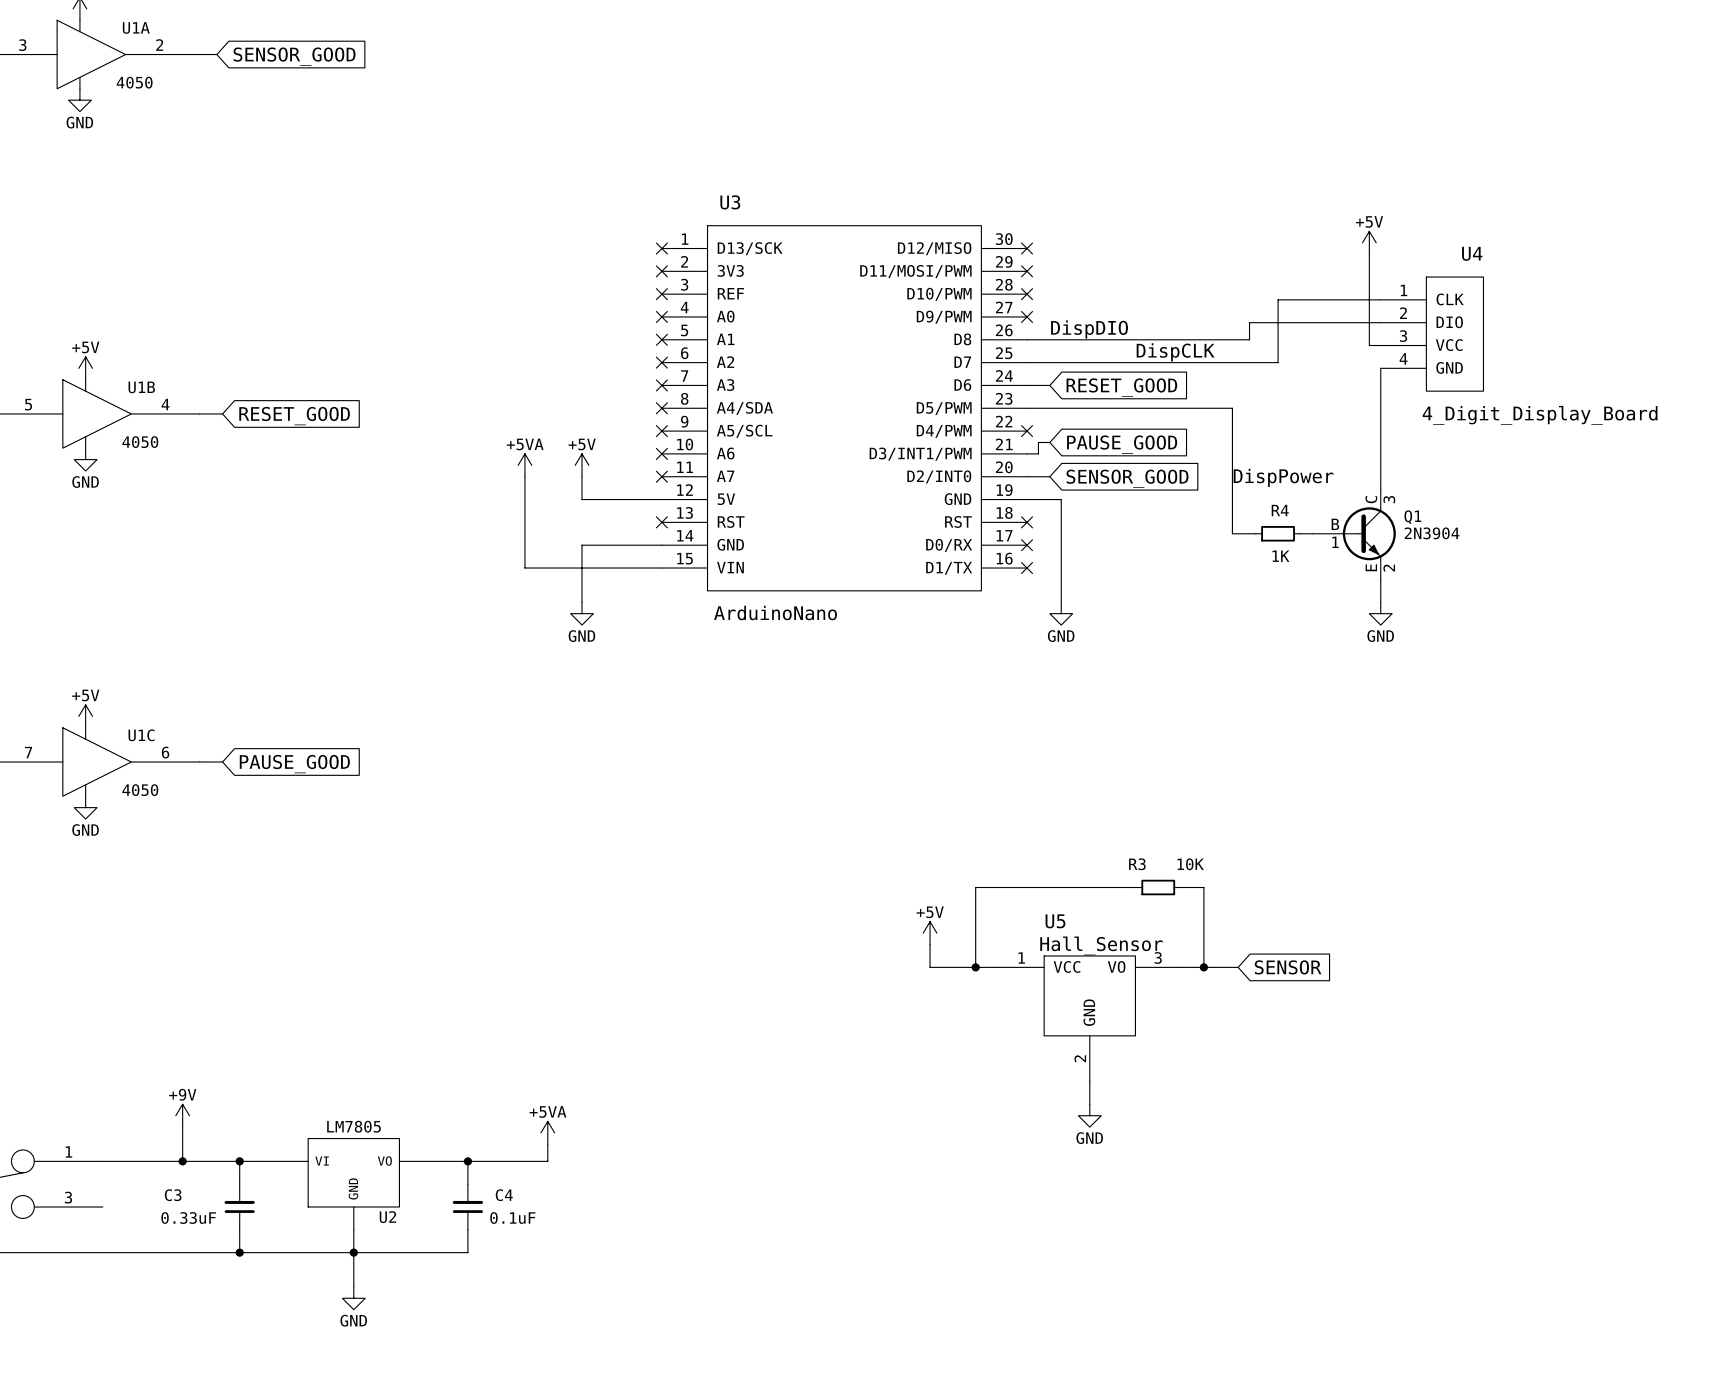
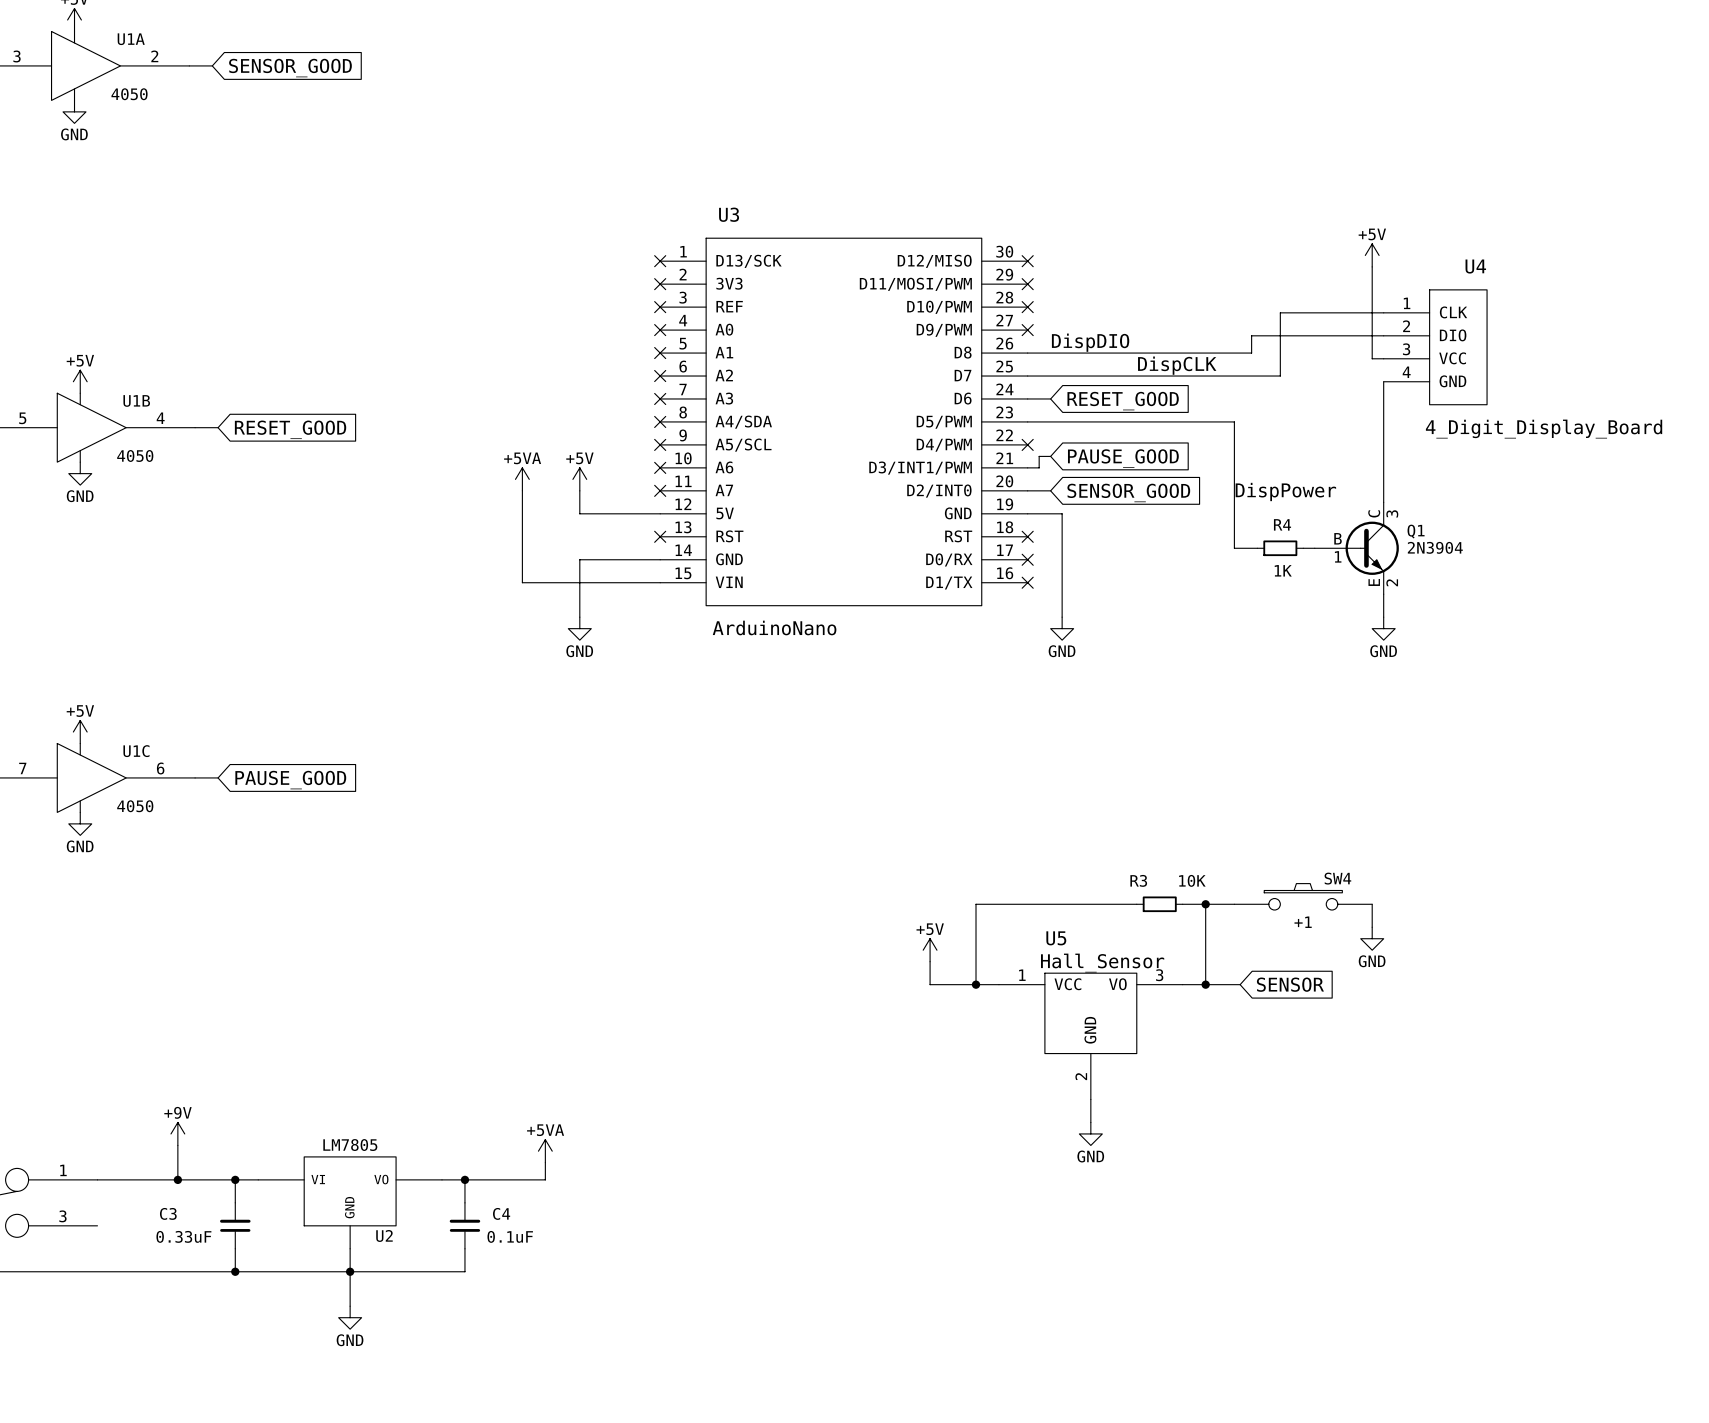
SW4: none -> +1 (1303, 896)
wire: none -> (1205, 904) (1234, 904)
junction: none -> (1205, 904)
wire: none -> (1372, 904) (1372, 927)
power symbol: none -> GND (1372, 938)

